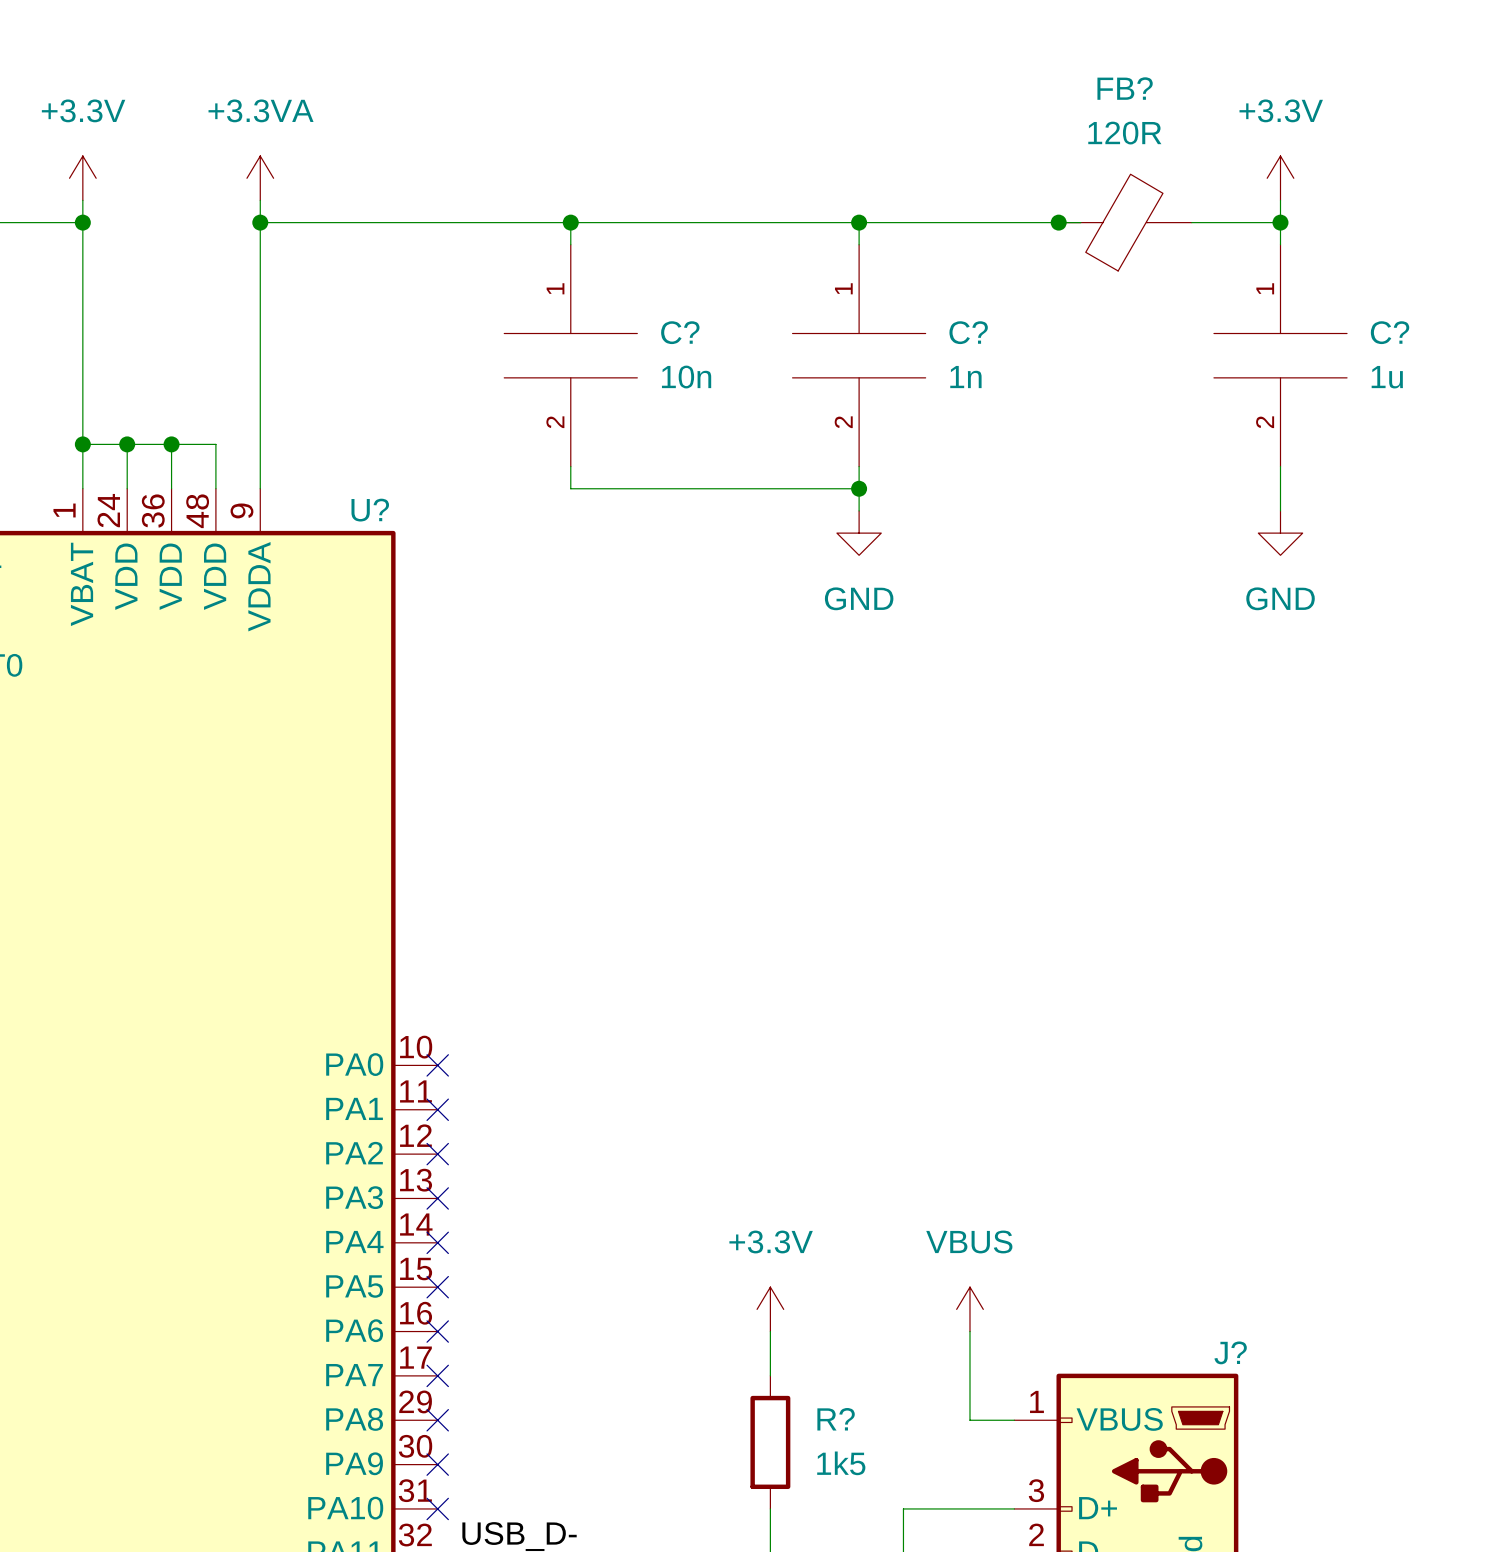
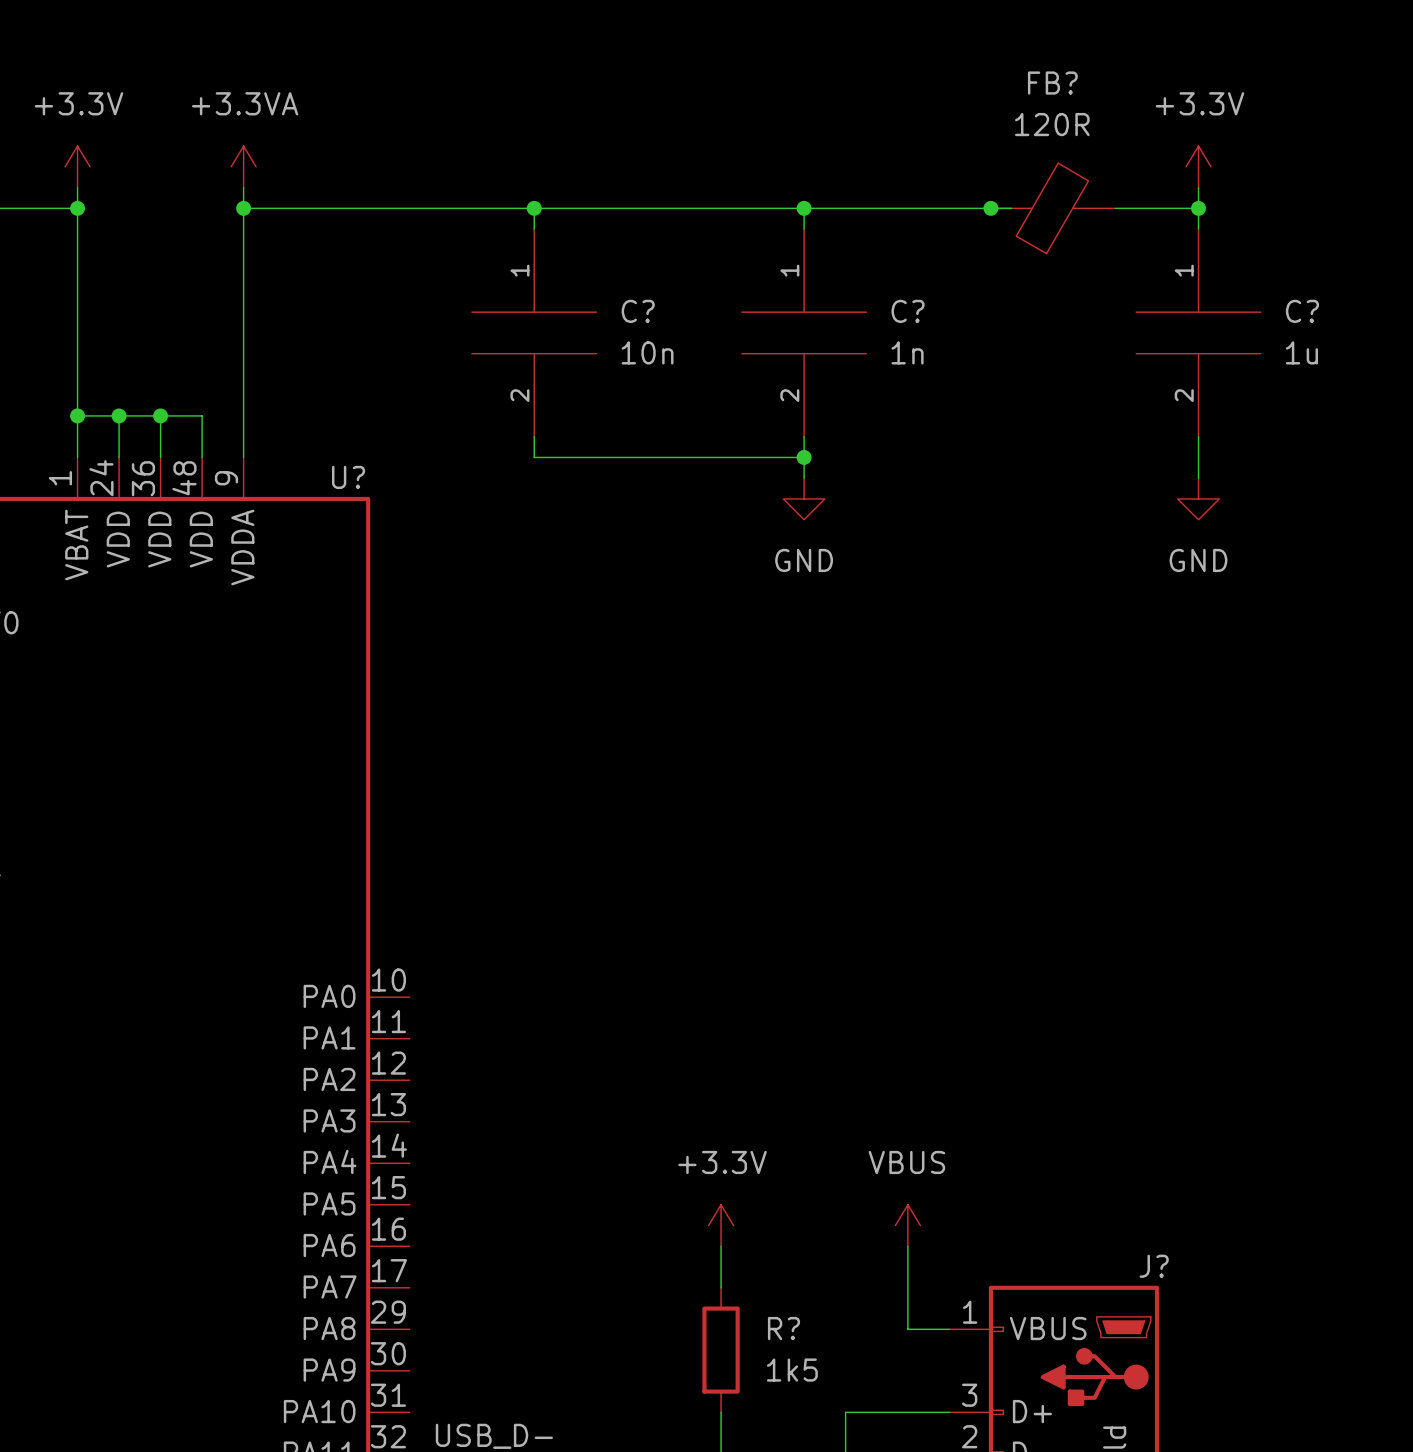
no-connect mark: (437, 1065) -> none
no-connect mark: (437, 1109) -> none
no-connect mark: (437, 1154) -> none
no-connect mark: (437, 1198) -> none
no-connect mark: (437, 1242) -> none
no-connect mark: (437, 1287) -> none
no-connect mark: (437, 1331) -> none
no-connect mark: (437, 1375) -> none
no-connect mark: (437, 1420) -> none
no-connect mark: (437, 1464) -> none
no-connect mark: (437, 1508) -> none

